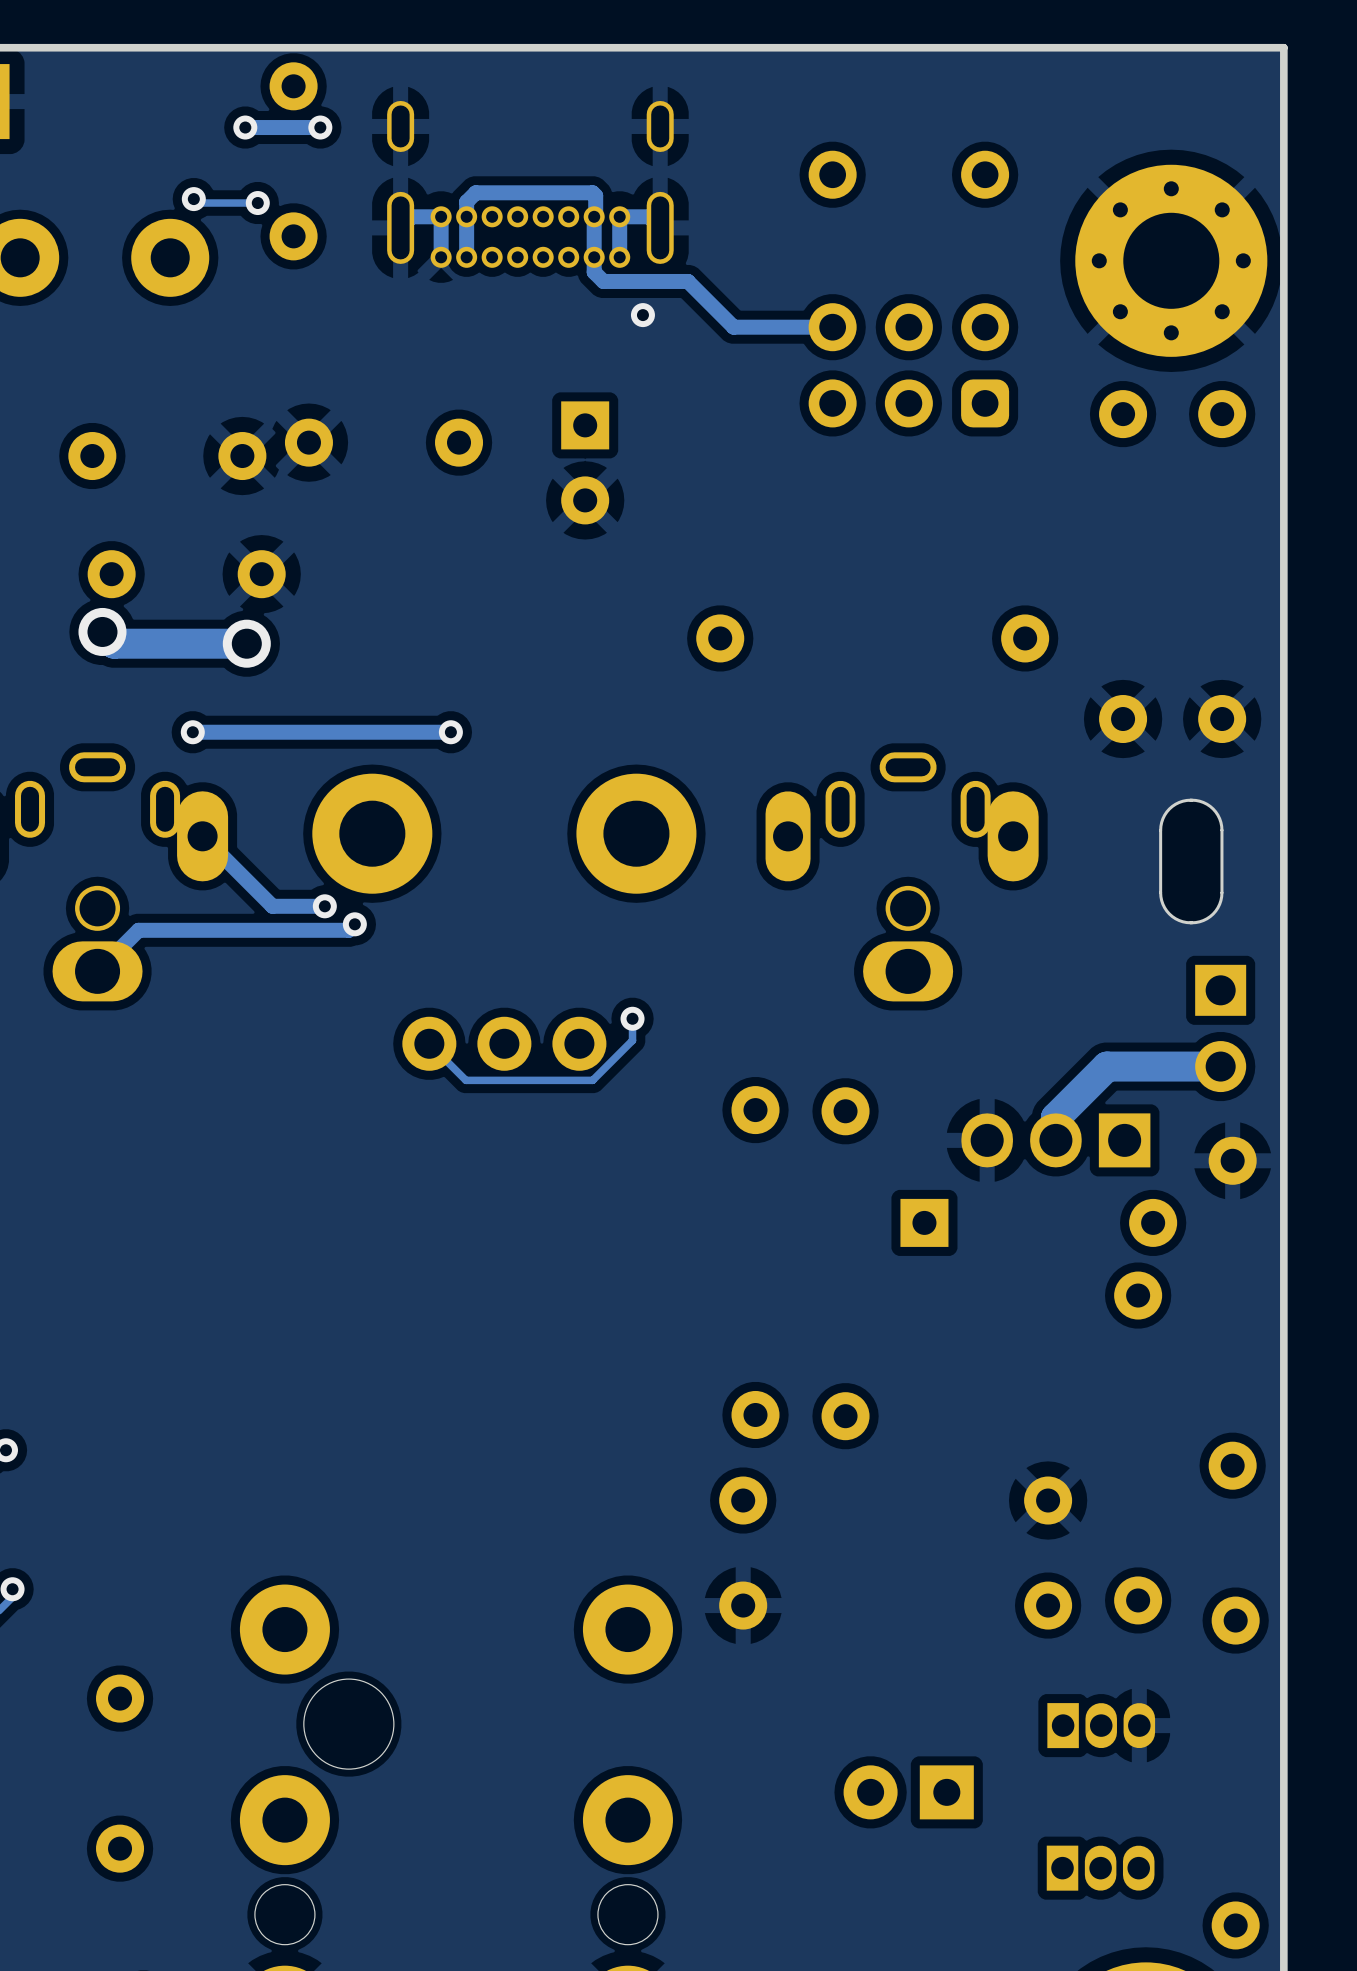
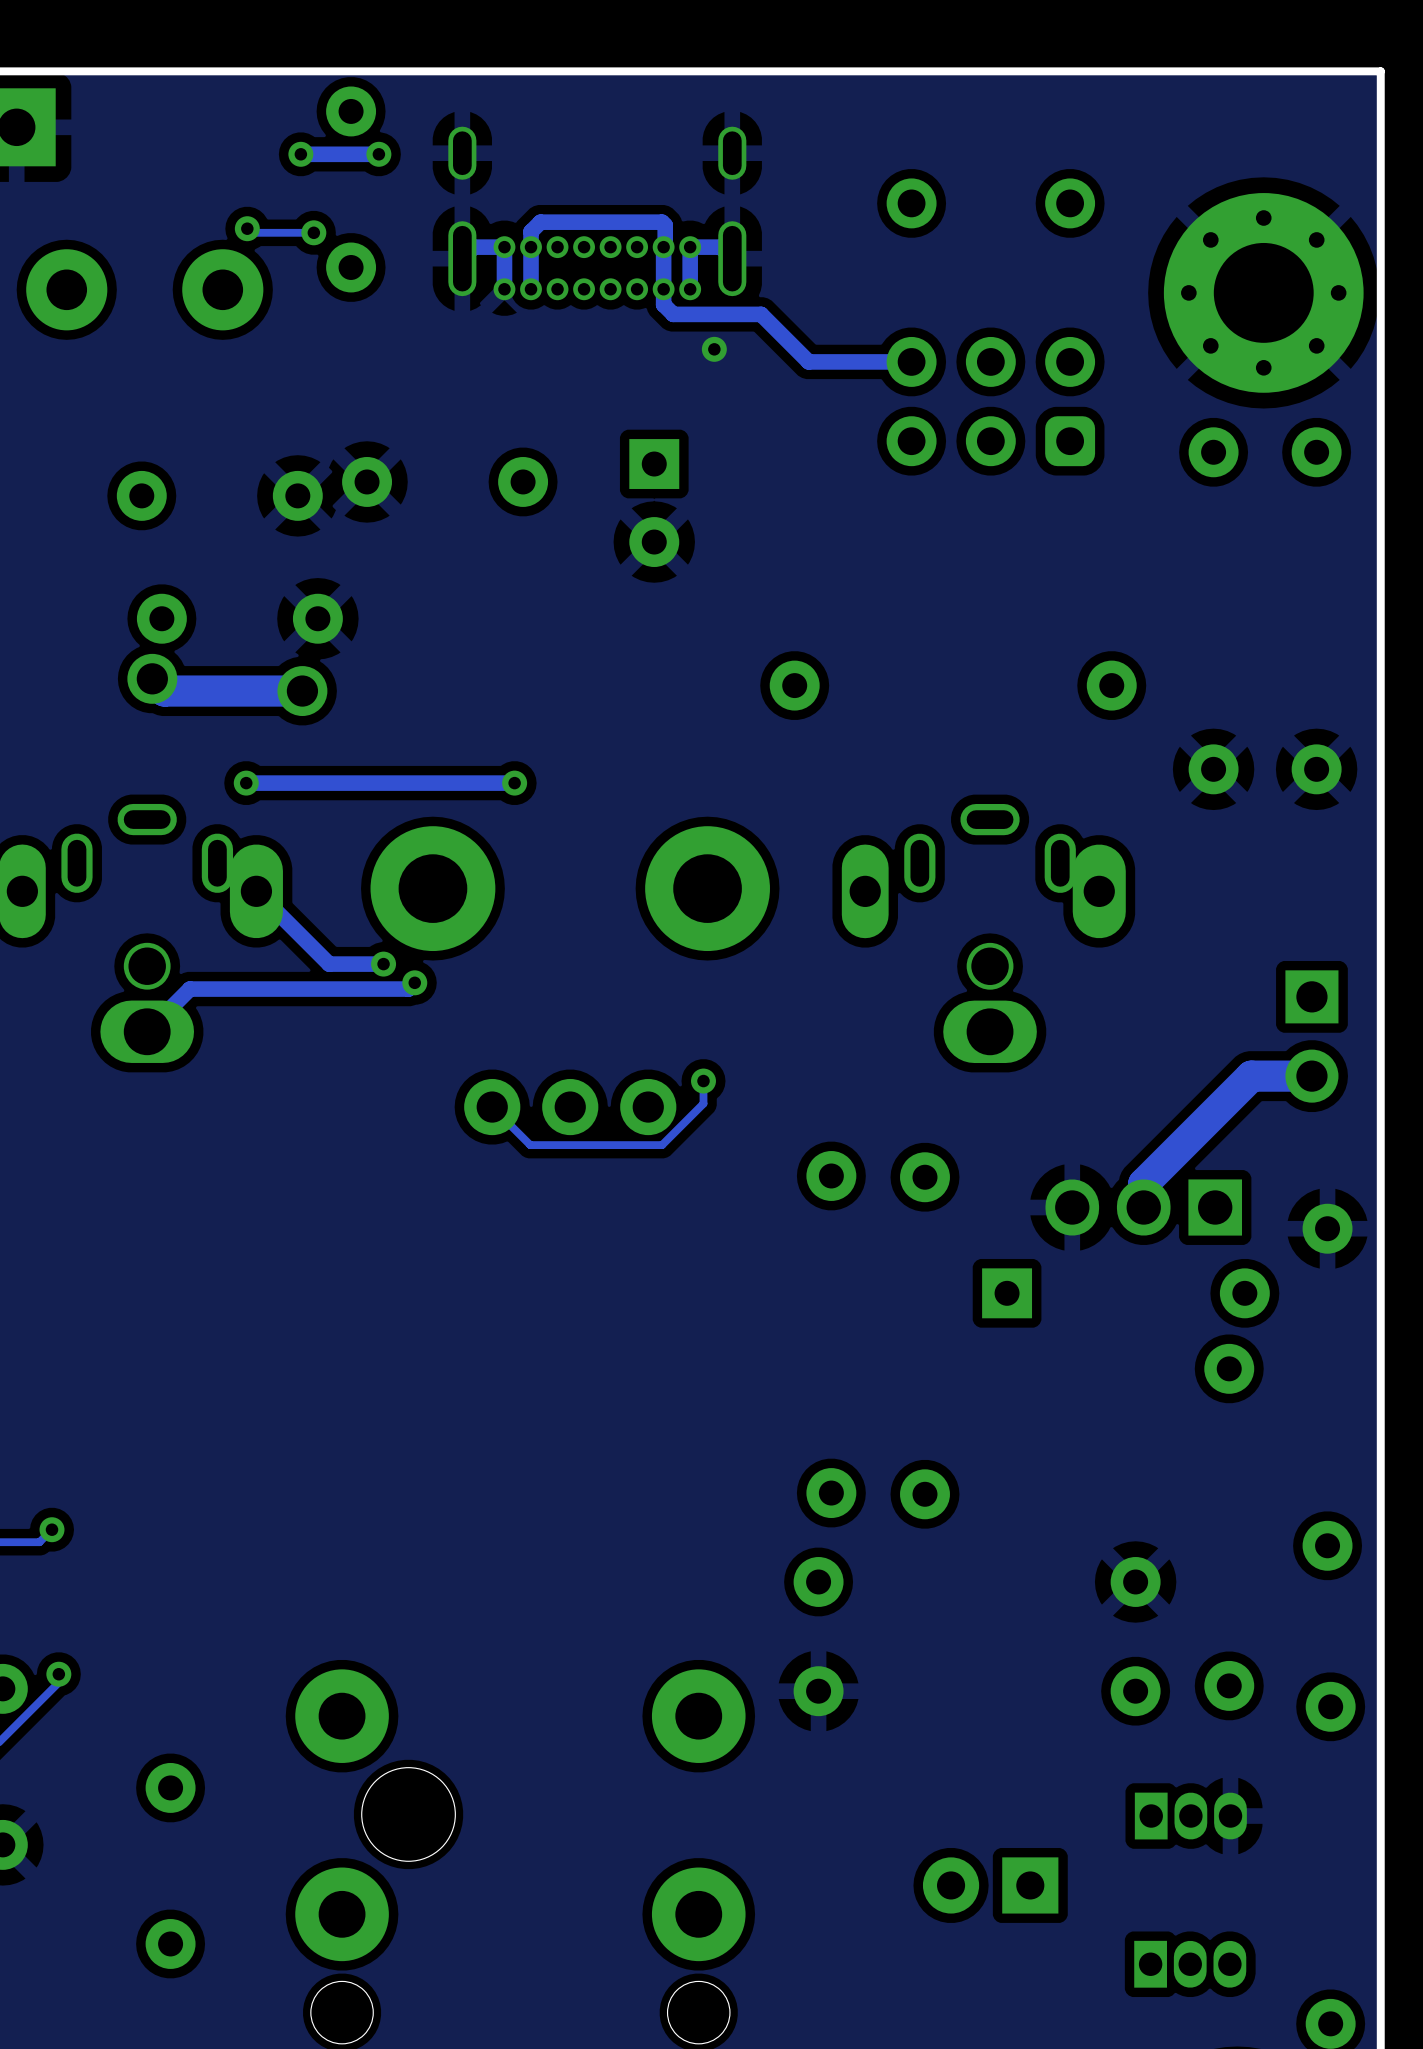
board edge: (1191, 800) (1179, 802) (1169, 808) (1162, 818) (1160, 830) (1161, 900) (1164, 907) (1172, 916) (1179, 920) (1190, 922) (1203, 920) (1213, 914) (1219, 904) (1221, 892) (1220, 822) (1215, 811) (1210, 806) (1203, 802) (1191, 800) -> none
part position: (1220, 1028) -> (1311, 1036)
track: (1220, 1066) (1106, 1066) -> (1311, 1076) (1251, 1076) (1196, 1130)

